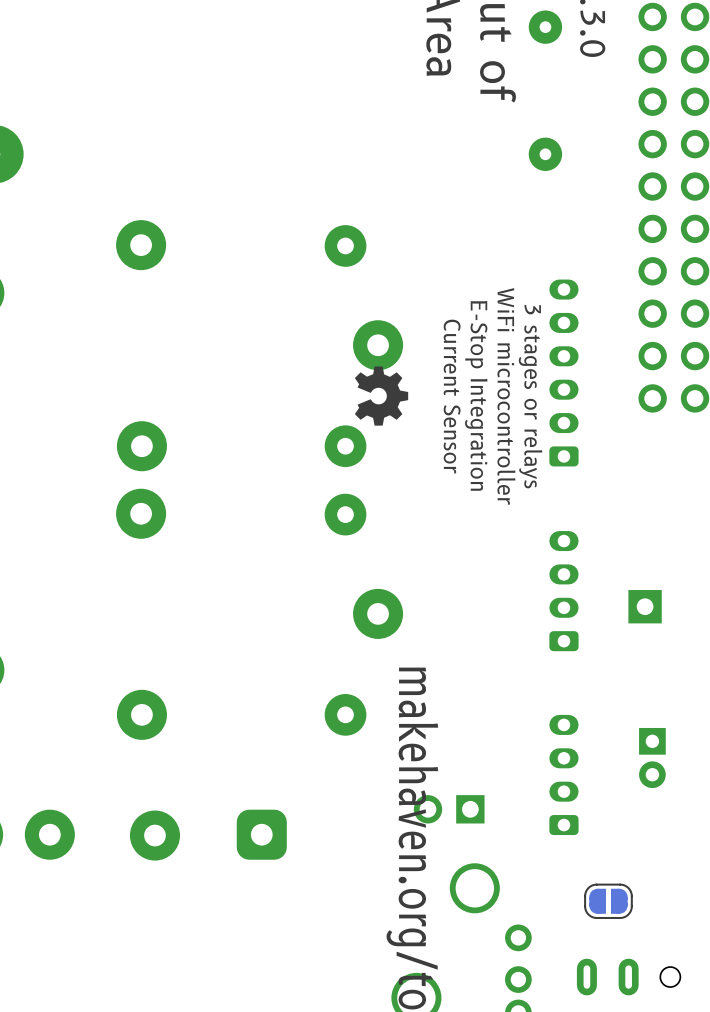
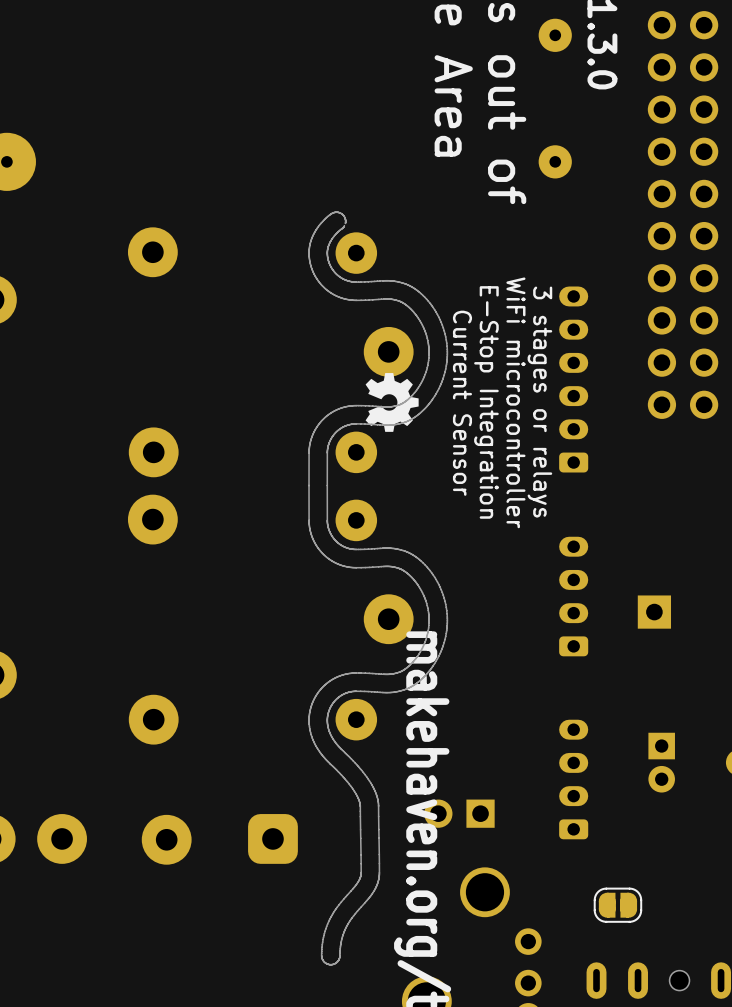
board edge: none -> (345, 223) (342, 214) (333, 212) (323, 220) (314, 232) (309, 254) (310, 266) (315, 277) (327, 290) (342, 298) (355, 300) (391, 299) (405, 304) (416, 315) (424, 329) (428, 344) (428, 360) (420, 384) (411, 395) (402, 403) (389, 406) (356, 405) (343, 407) (328, 414) (317, 425) (311, 437) (309, 449) (309, 529) (319, 549) (337, 563) (353, 567) (391, 566) (406, 572) (416, 582) (423, 594) (427, 608) (429, 621) (427, 635) (422, 648) (414, 660) (405, 668) (391, 674) (353, 673) (338, 676) (321, 688) (310, 707) (309, 724) (314, 743) (323, 756) (351, 787) (360, 805) (360, 875) (356, 884) (334, 911) (325, 929) (321, 956) (324, 962) (330, 964) (338, 960) (341, 941) (345, 928) (373, 891) (379, 874) (376, 796) (365, 774) (343, 750)
board edge: none -> (344, 225) (333, 237) (327, 248) (328, 259) (333, 270) (340, 277) (349, 281) (394, 281) (407, 284) (417, 290) (429, 303) (440, 319) (446, 339) (447, 357) (444, 375) (437, 391) (427, 405) (415, 417) (393, 424) (349, 424) (340, 428) (332, 436) (327, 451) (328, 527) (335, 540) (347, 548) (394, 548) (407, 552) (417, 558) (429, 570) (440, 587) (445, 604) (447, 620) (444, 639) (438, 656) (428, 672) (415, 683) (405, 689) (393, 692) (350, 691) (341, 695) (334, 701) (328, 713) (327, 725) (332, 738) (342, 750)

